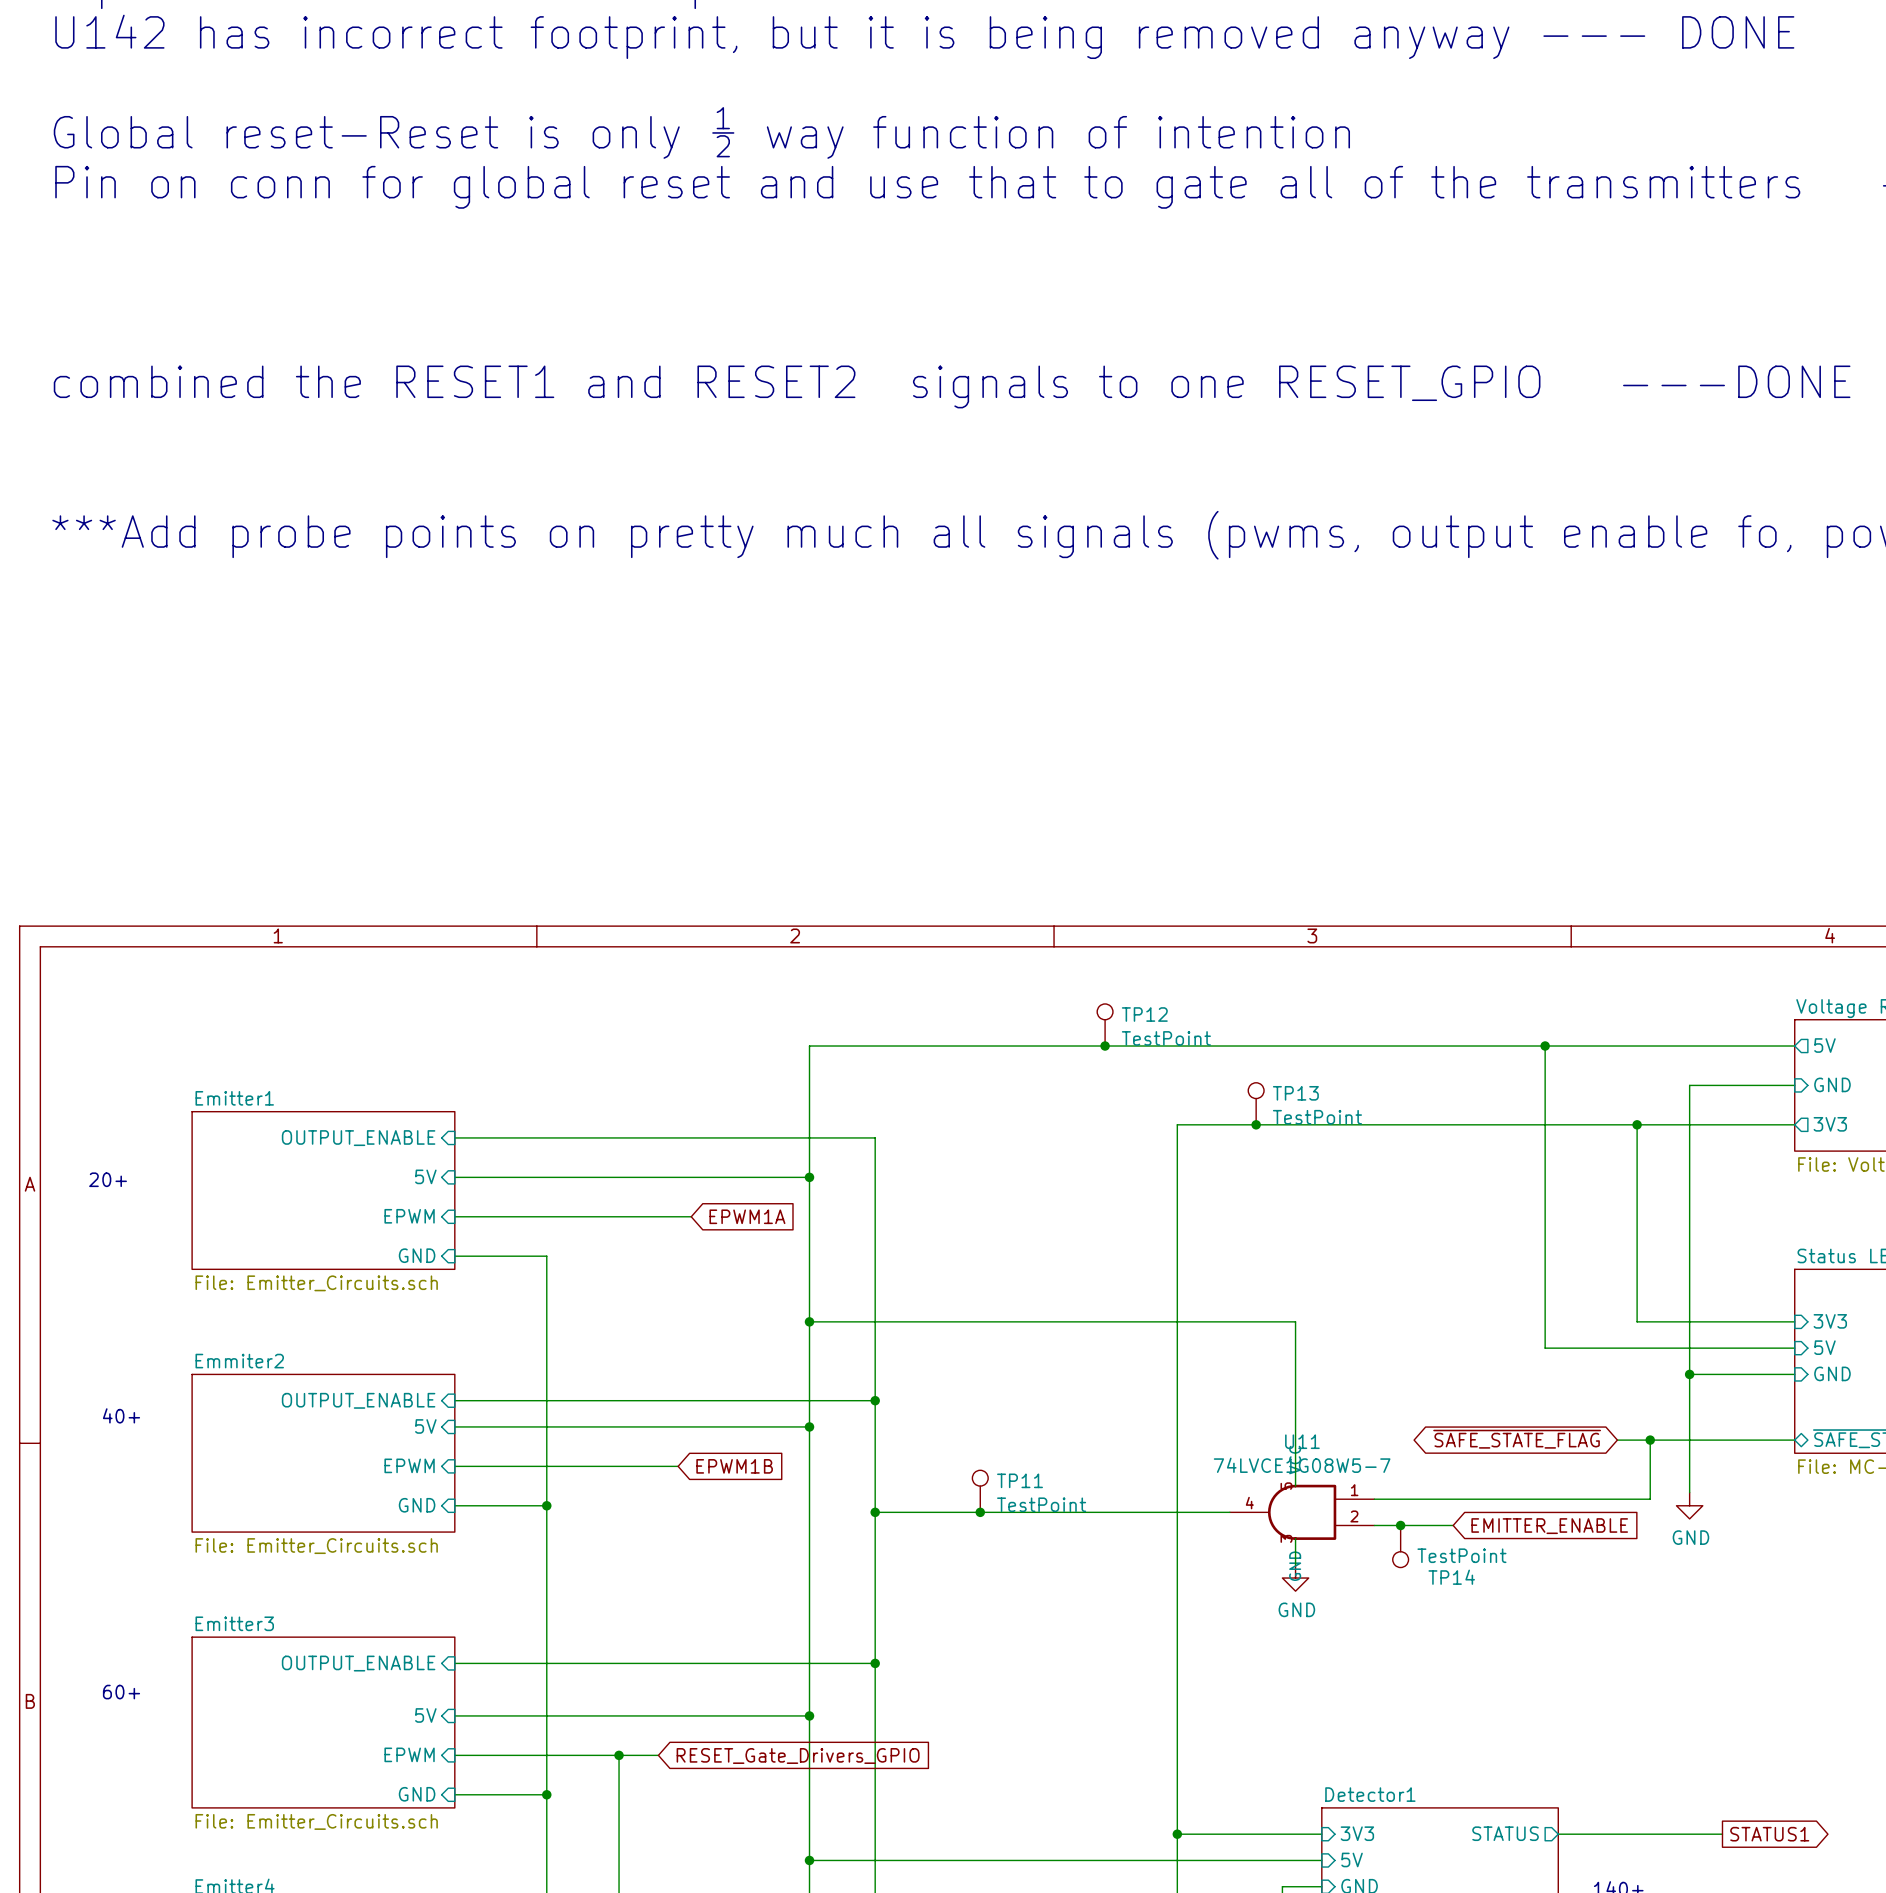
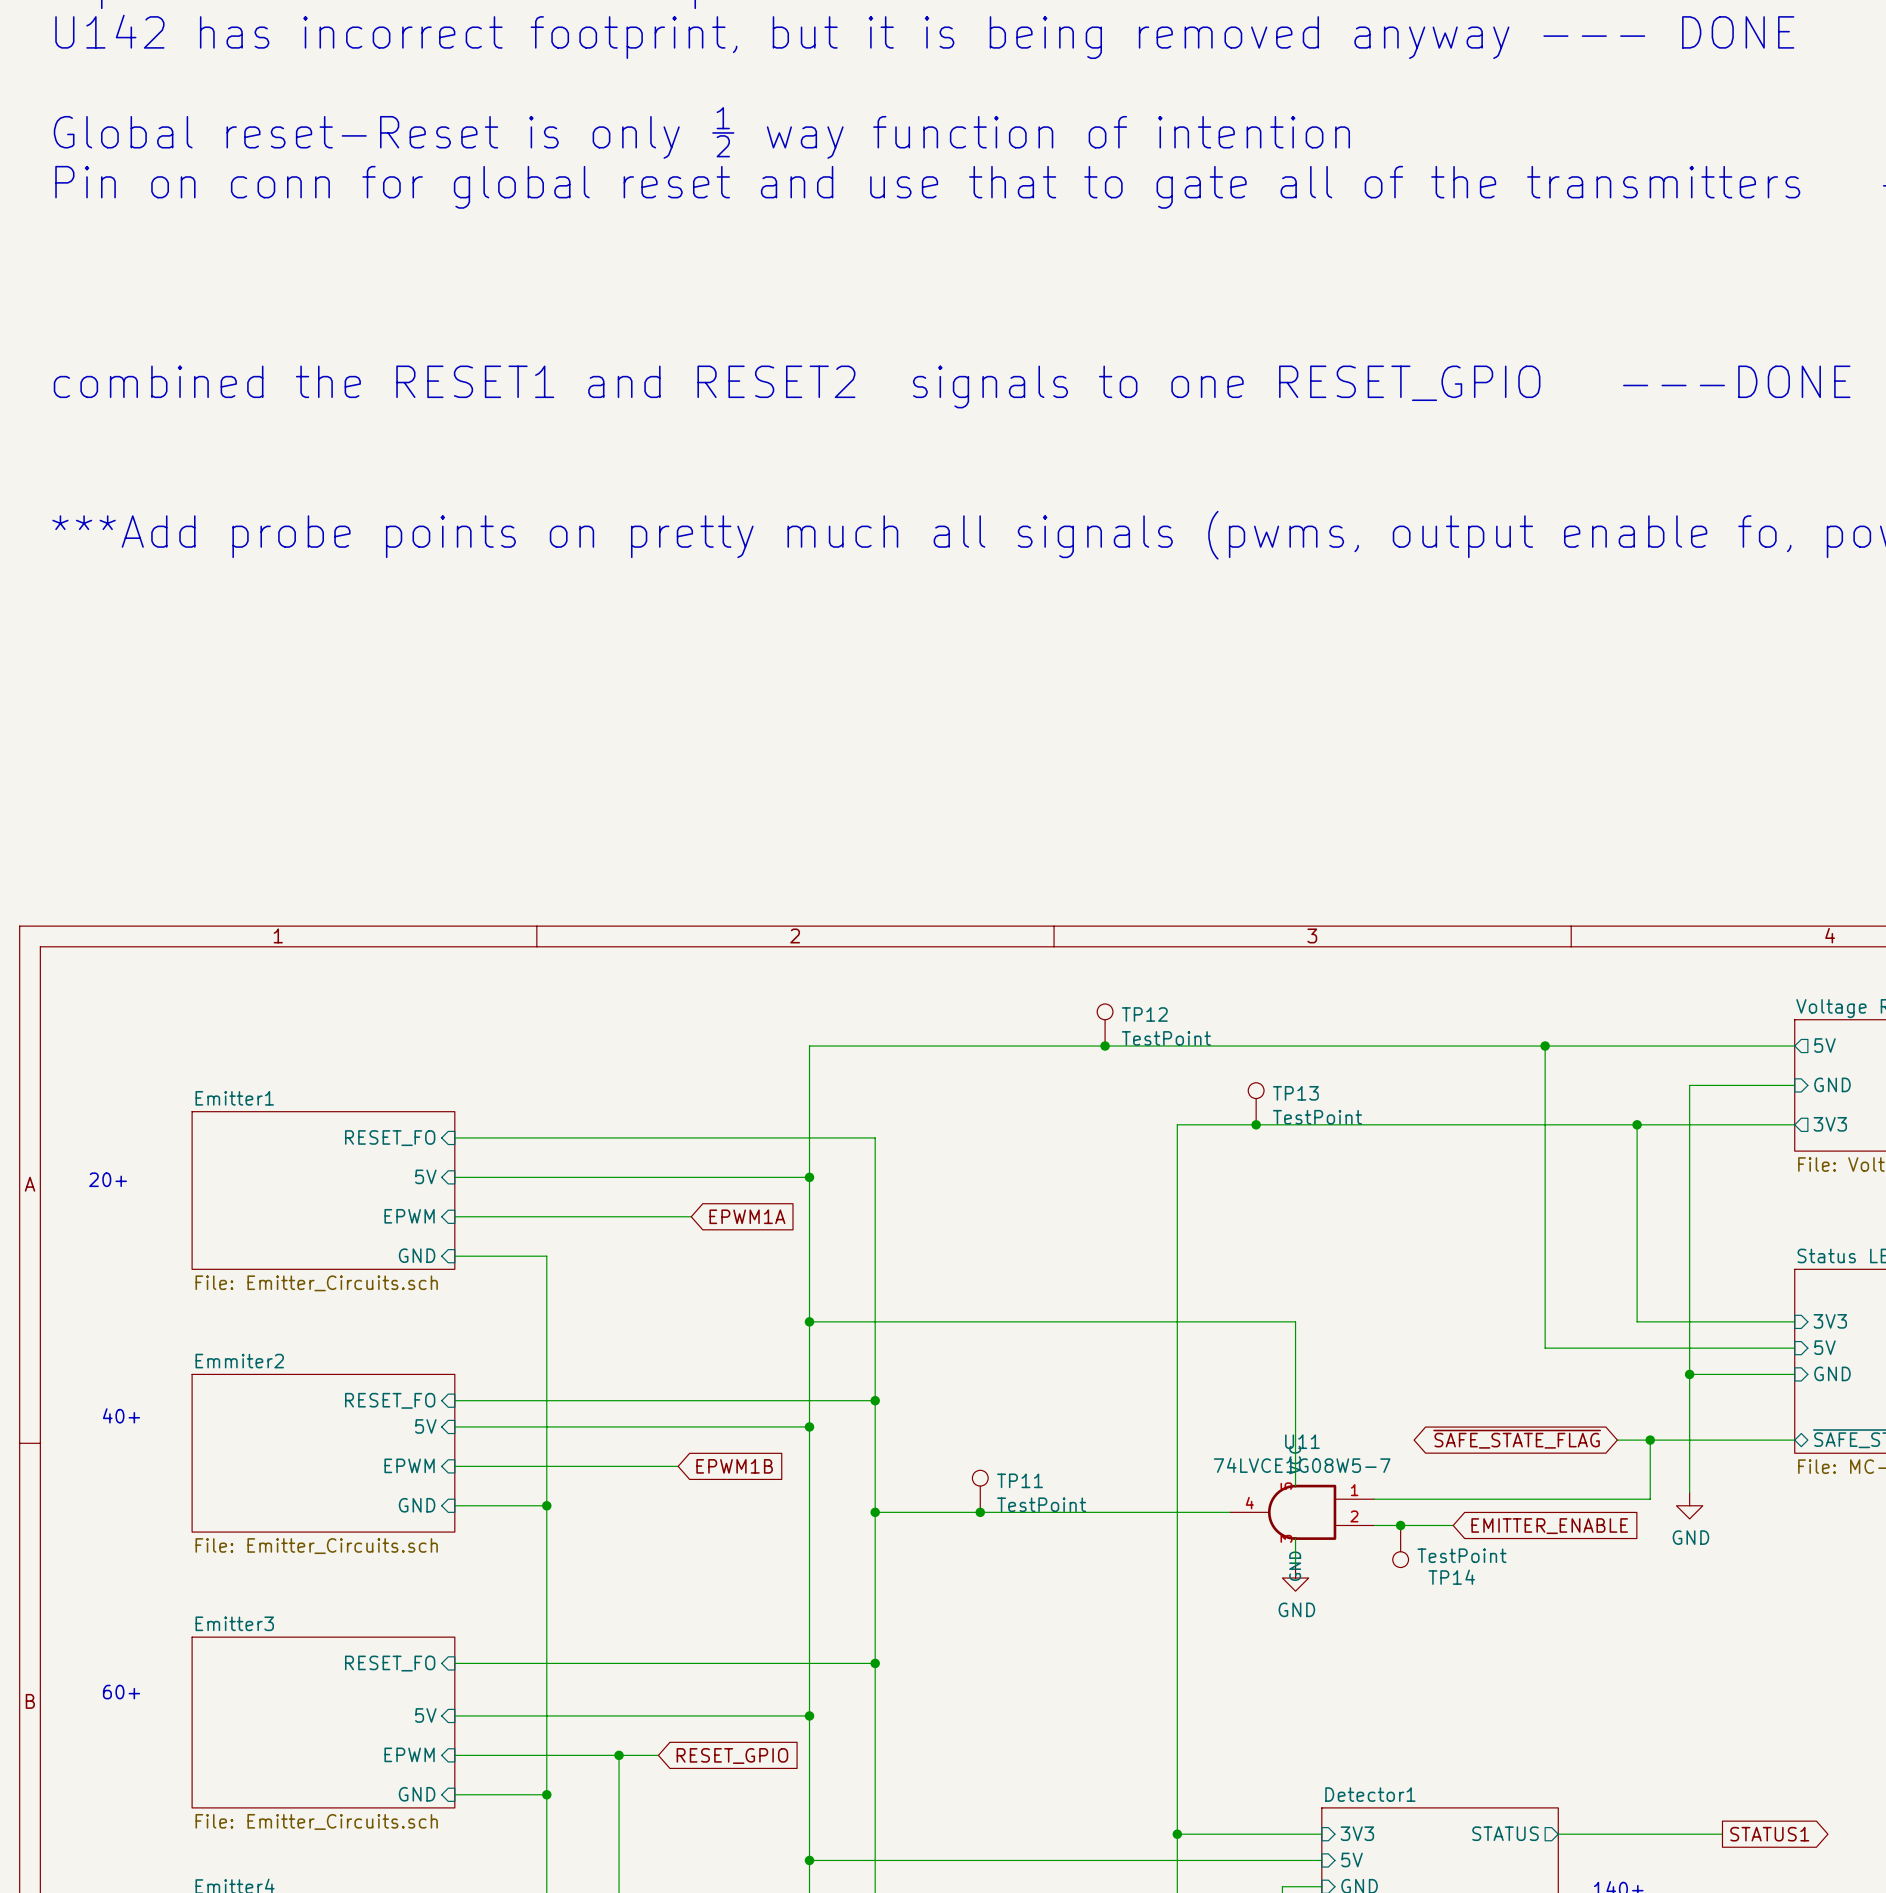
sheet pin: OUTPUT_ENABLE (358, 1138) -> RESET_FO (390, 1138)
sheet pin: OUTPUT_ENABLE (358, 1400) -> RESET_FO (390, 1400)
sheet pin: OUTPUT_ENABLE (358, 1663) -> RESET_FO (390, 1663)
global label: RESET_Gate_Drivers_GPIO (798, 1755) -> RESET_GPIO (732, 1755)

